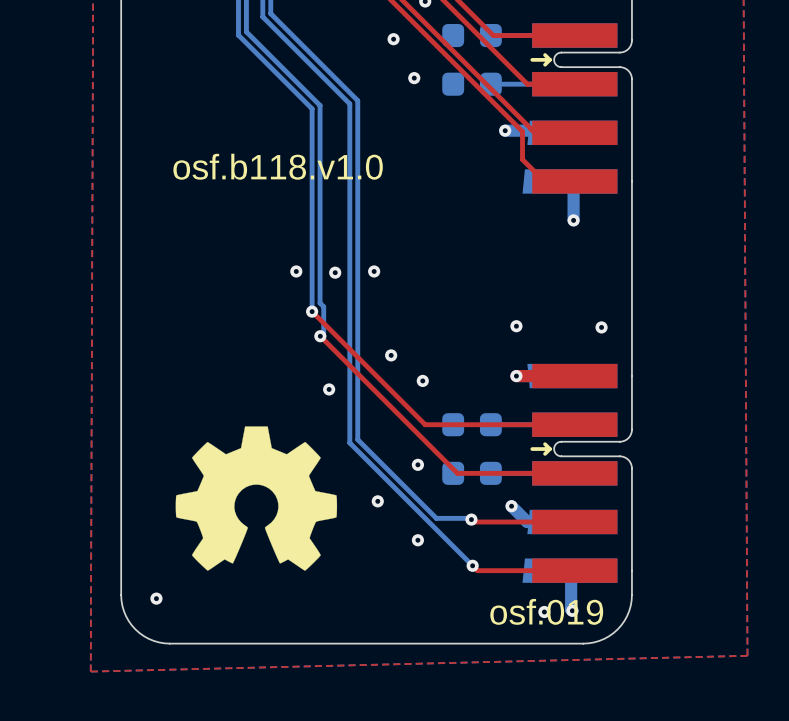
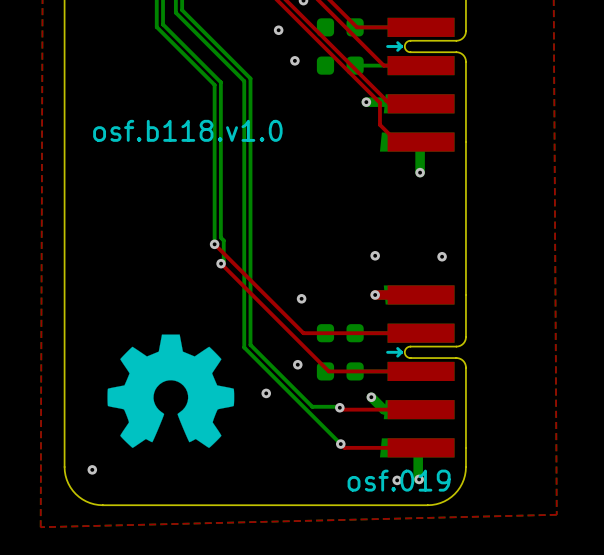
via: (296, 271) -> none
via: (374, 271) -> none
via: (335, 272) -> none
via: (391, 355) -> none
via: (329, 389) -> none
via: (417, 540) -> none

